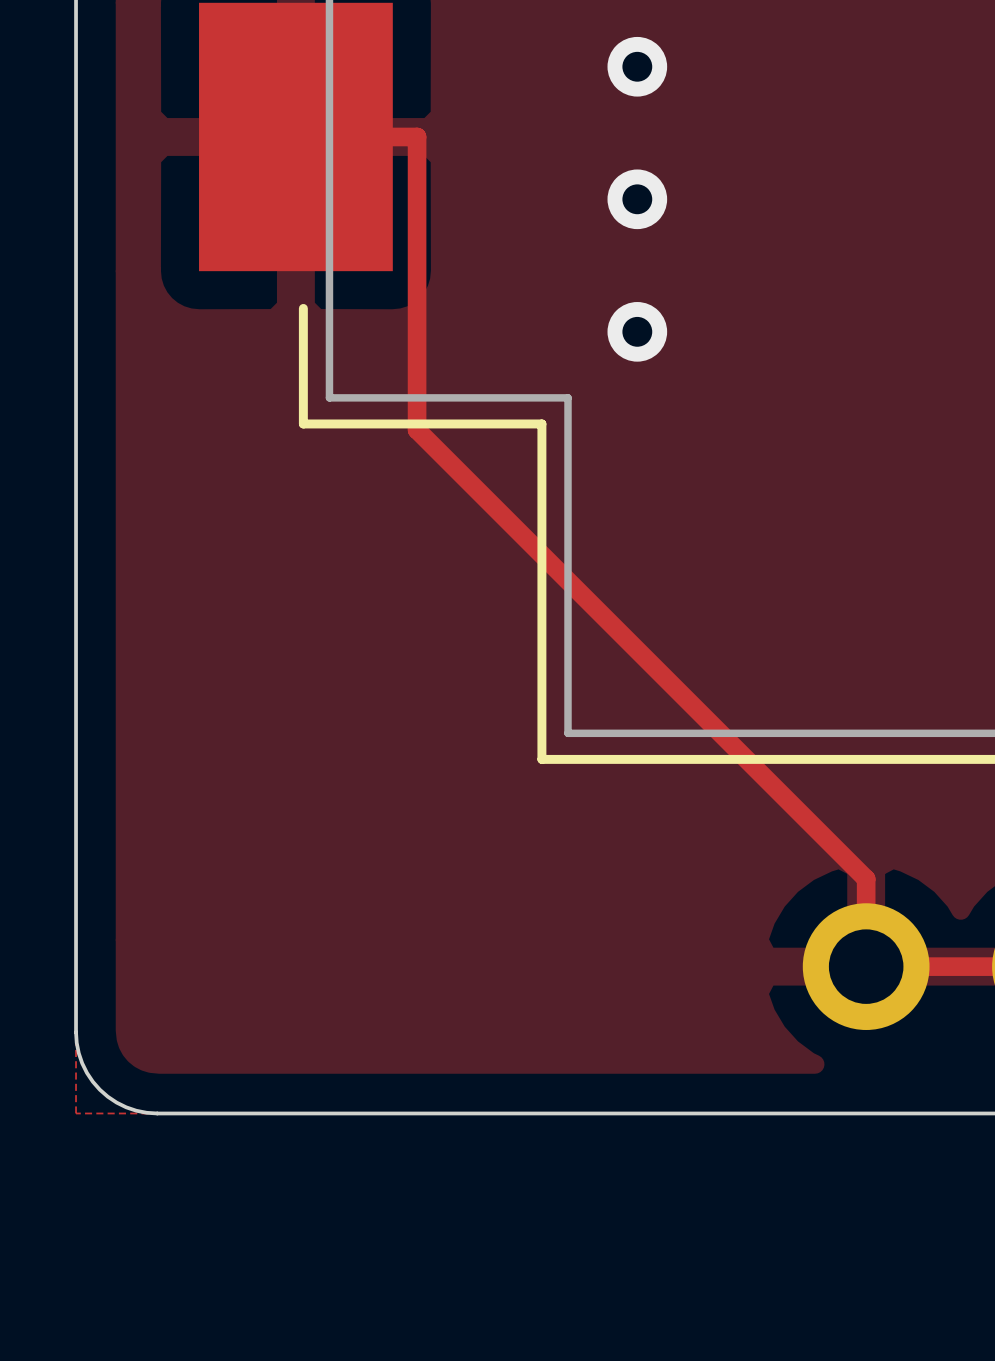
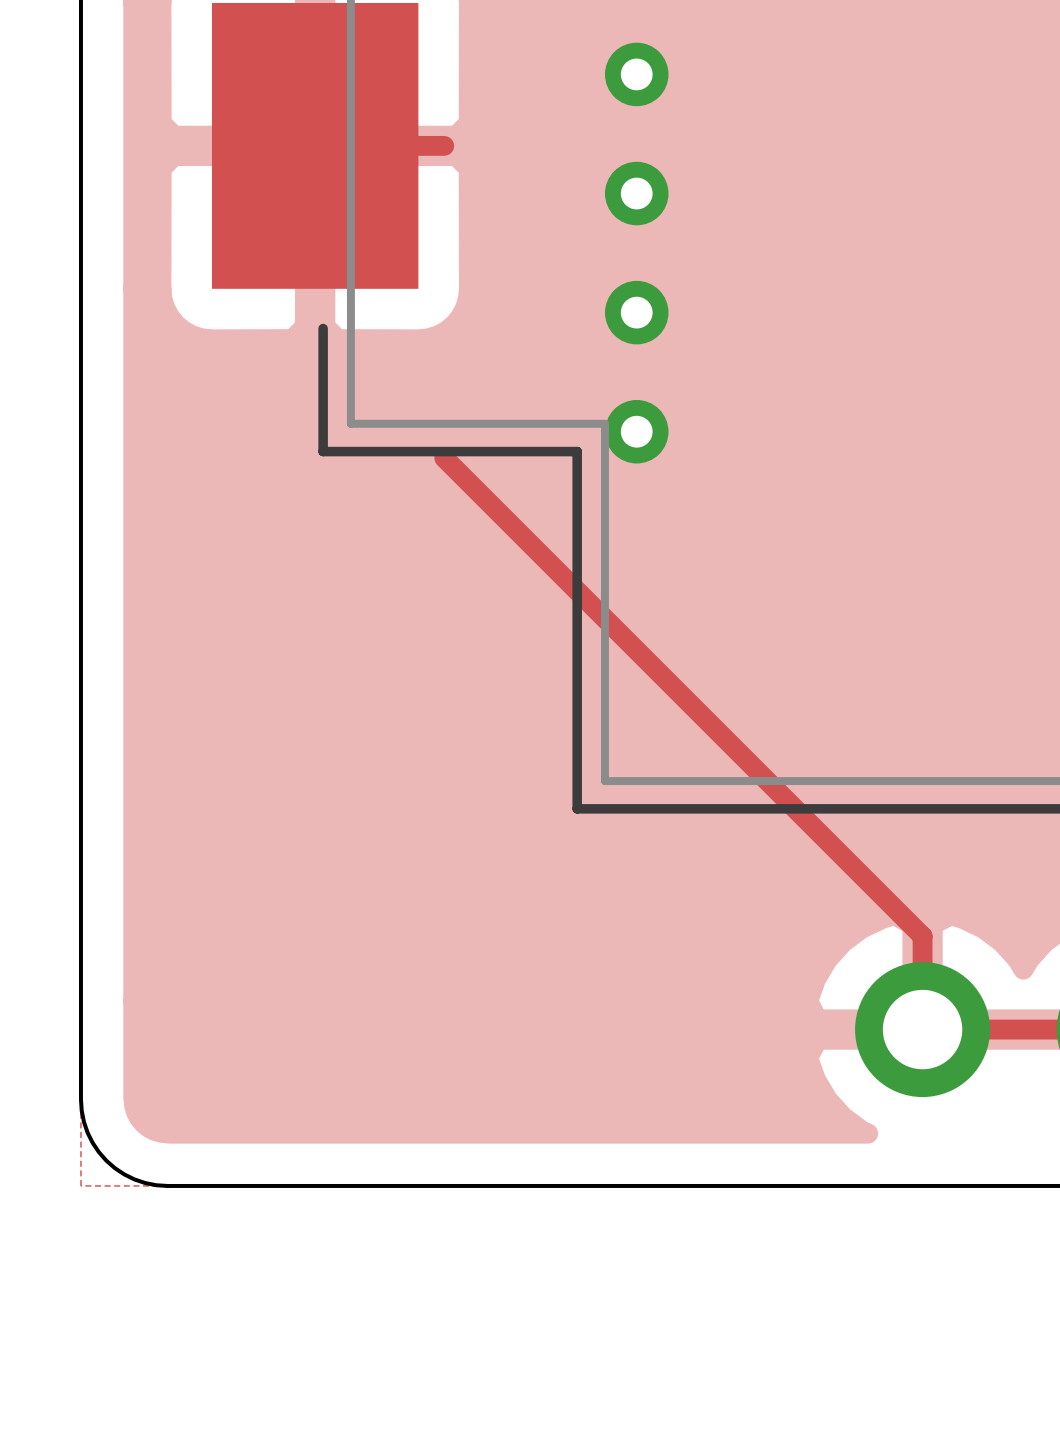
via position: (637, 66) -> (636, 74)
track: (417, 136) (417, 429) -> none
via position: (637, 199) -> (636, 193)
via position: (637, 331) -> (636, 312)
via: none -> (636, 431)

